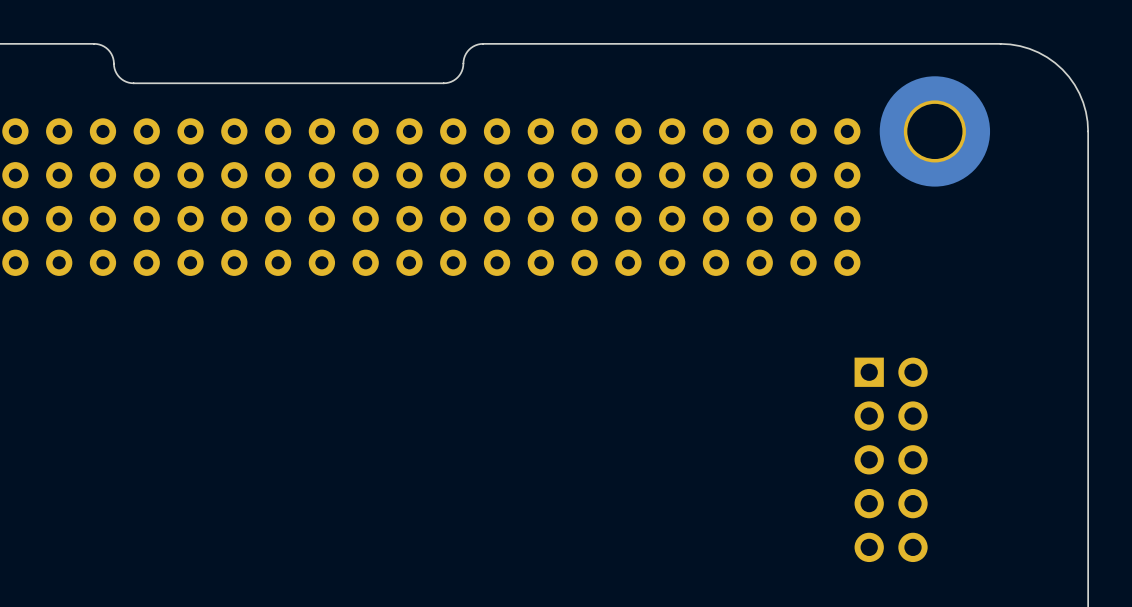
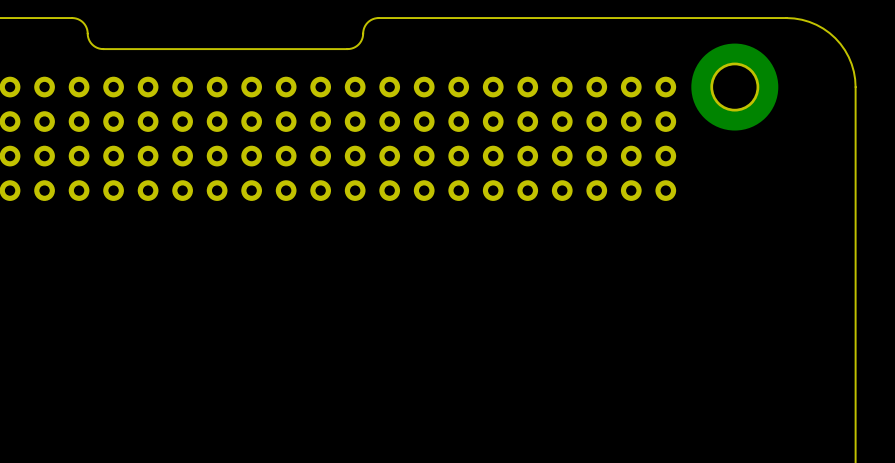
part: (891, 459) -> none

